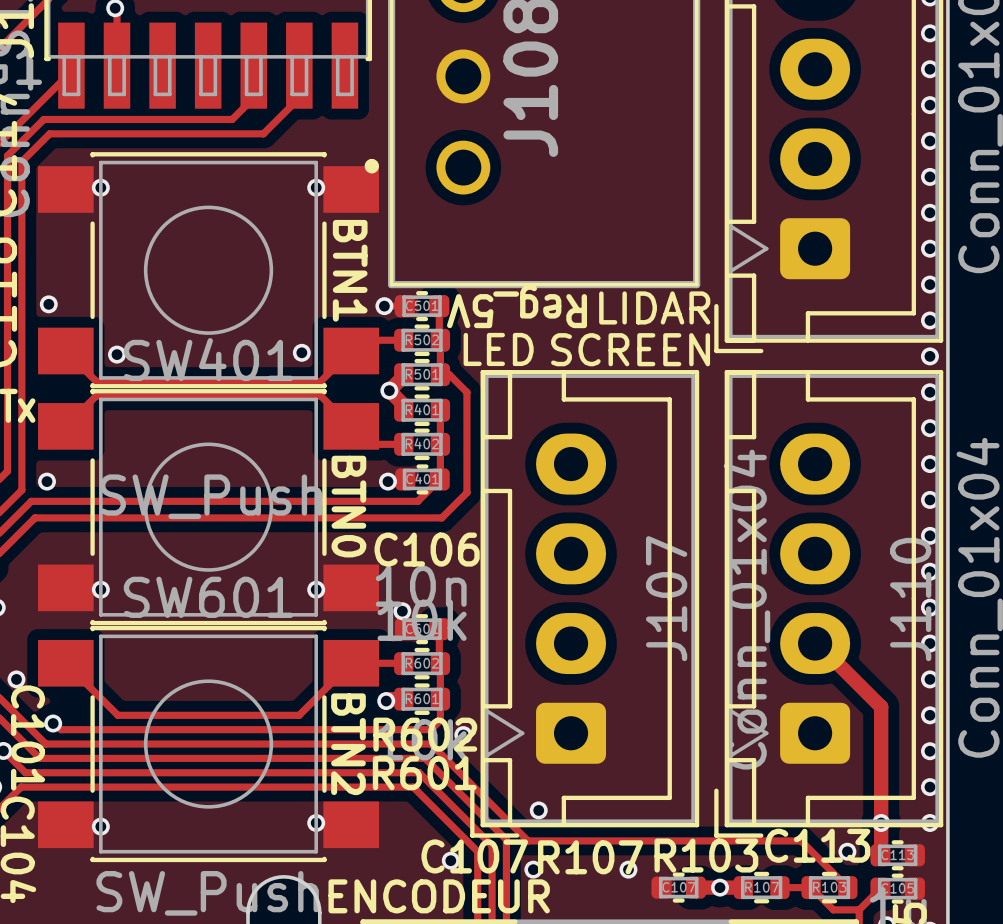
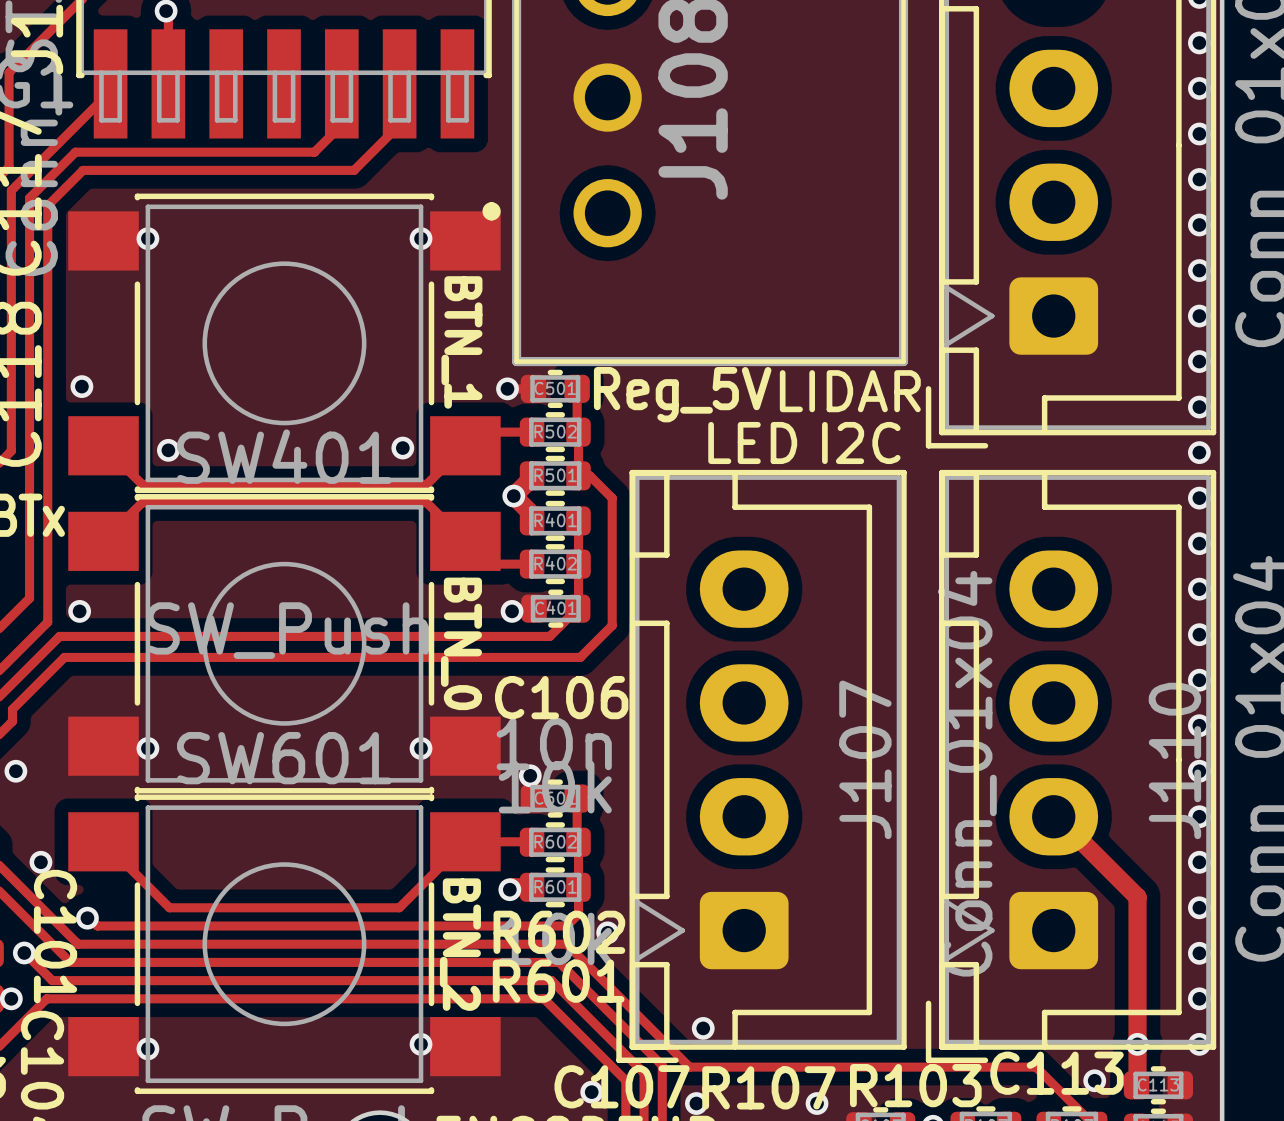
text: BTN1 (350, 270) -> BTN_1 (461, 342)
text rotation: 0° (517, 306) -> 180° (682, 394)
text: none -> I2C (861, 442)
text: LED (498, 349) -> none
text: SCREEN (630, 349) -> LED (752, 442)
text: BTN0 (348, 506) -> BTN_0 (461, 643)
text: BTN2 (348, 744) -> BTN_2 (460, 944)

